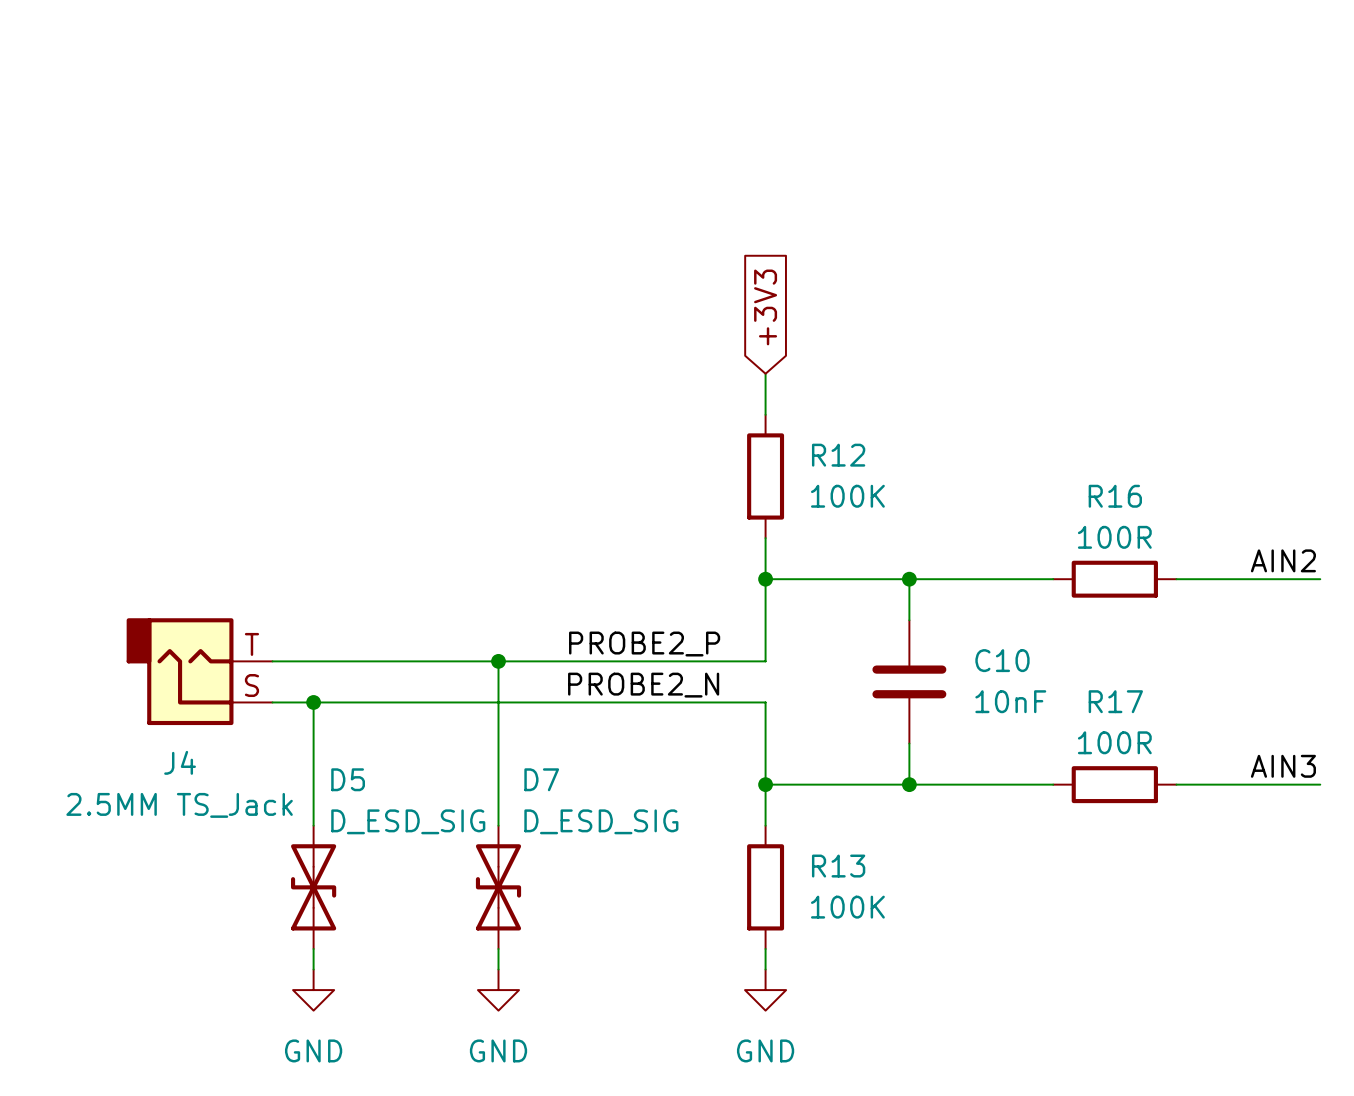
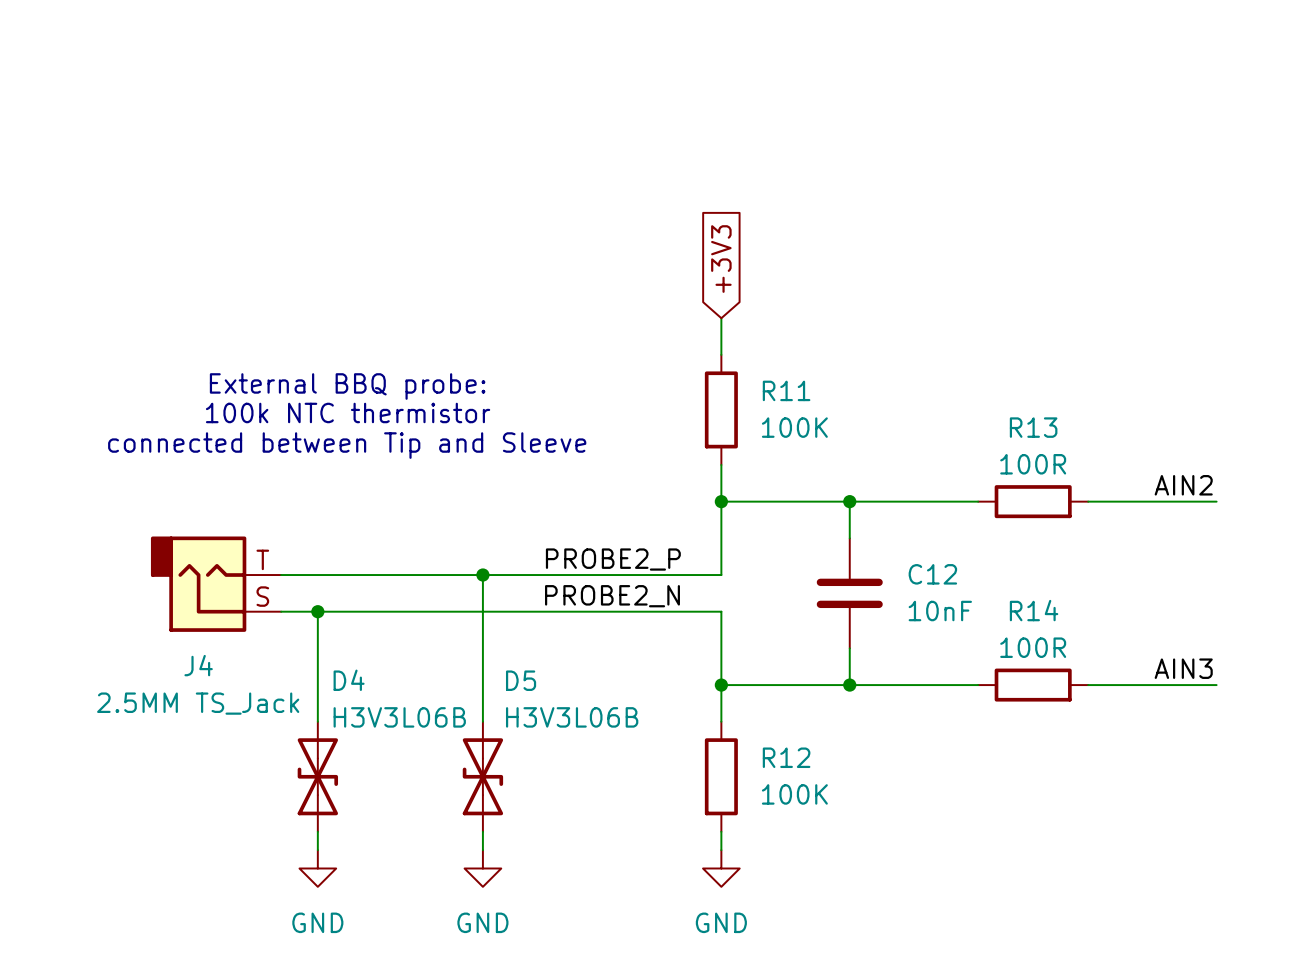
text: none -> External BBQ probe: (347, 386)
R12 name: R12 (838, 455) -> R11 (786, 390)
text: none -> 100k NTC thermistor (348, 412)
R16 name: R16 (1115, 496) -> R13 (1033, 427)
text: none -> connected between Tip and Sleeve (347, 445)
C10 name: C10 (1002, 660) -> C12 (932, 574)
R17 name: R17 (1115, 701) -> R14 (1034, 610)
D5 name: D5 (348, 779) -> D4 (349, 680)
D7 name: D7 (541, 779) -> D5 (521, 680)
D5 value: D_ESD_SIG (408, 821) -> H3V3L06B (399, 717)
D7 value: D_ESD_SIG (601, 821) -> H3V3L06B (572, 717)
R13 name: R13 (838, 866) -> R12 (786, 757)

